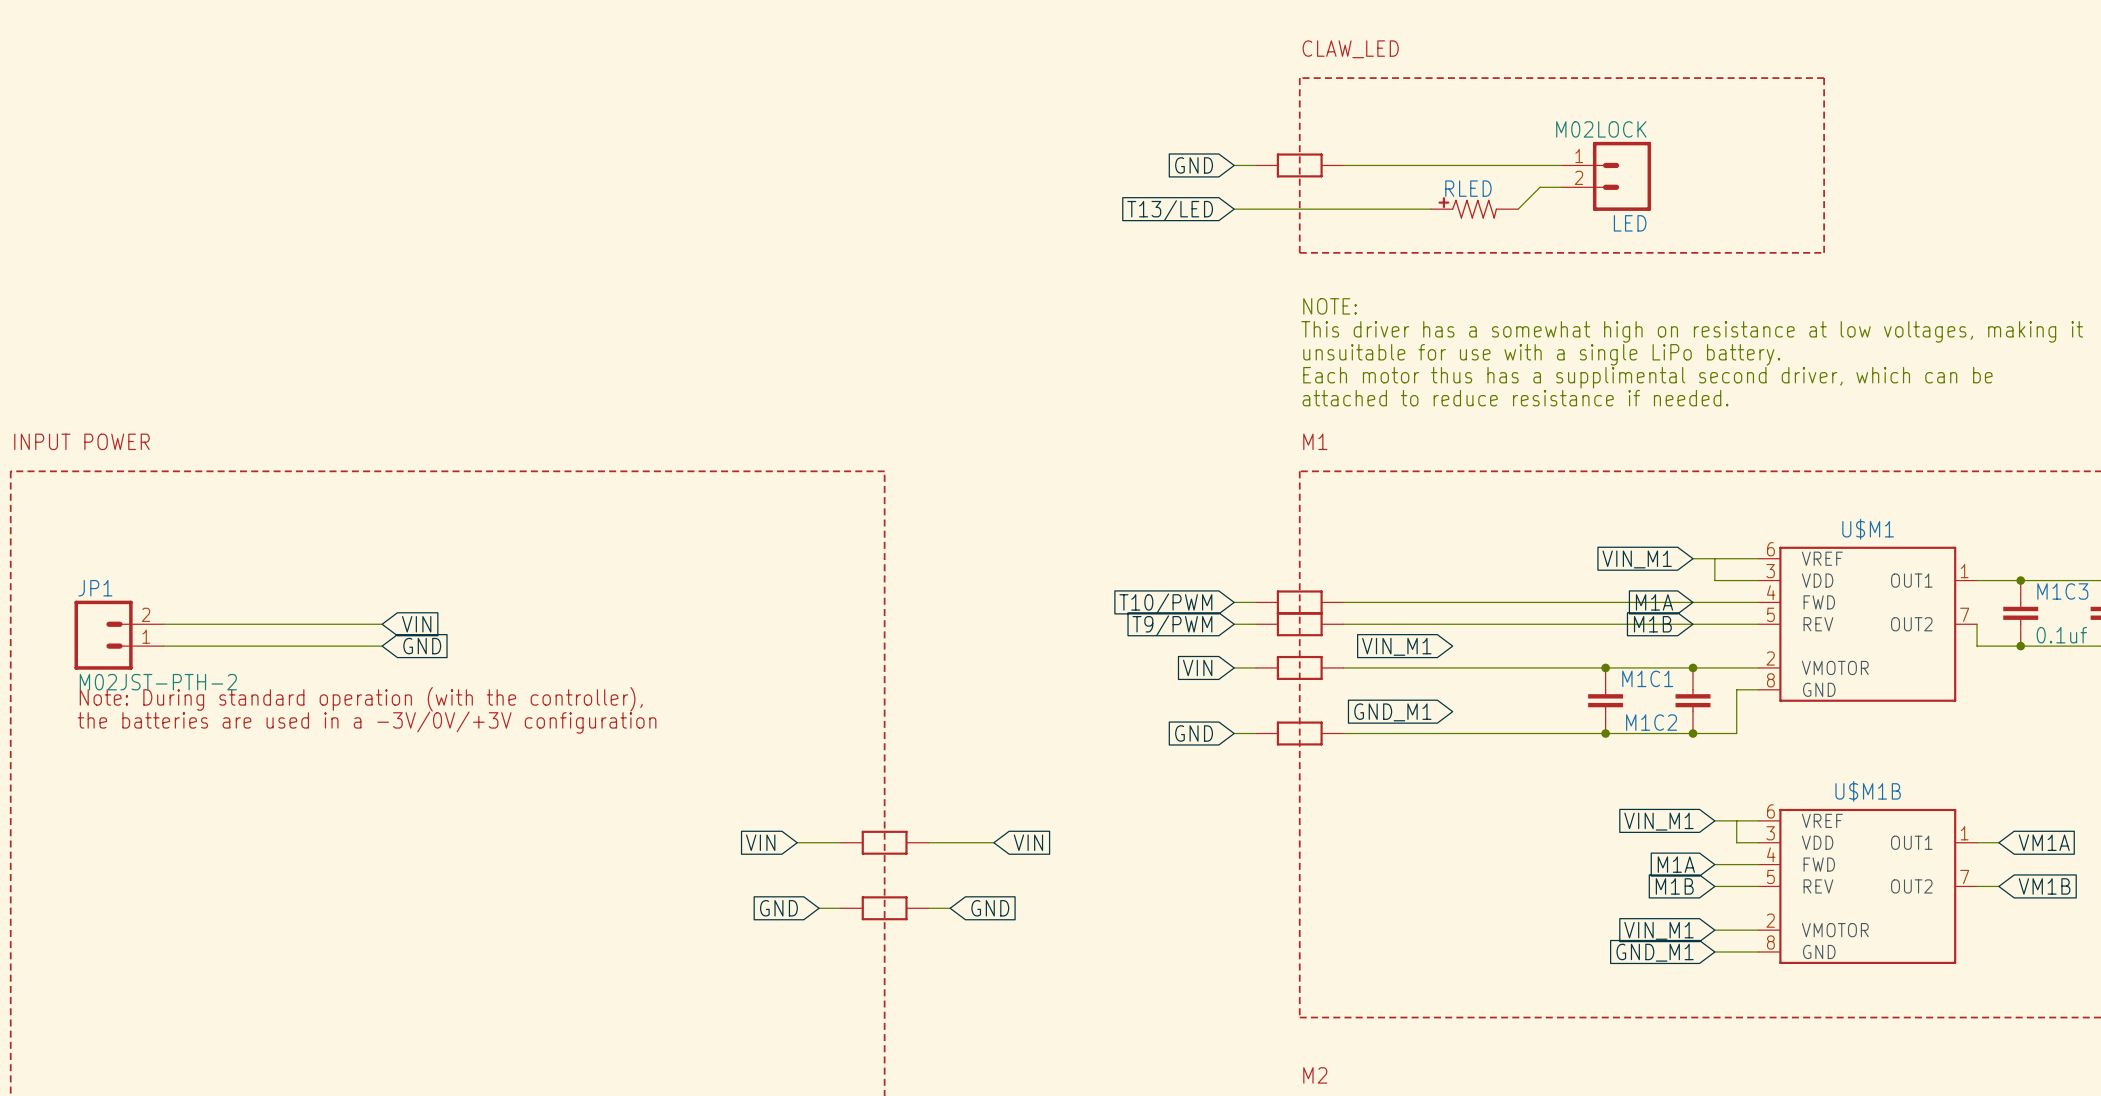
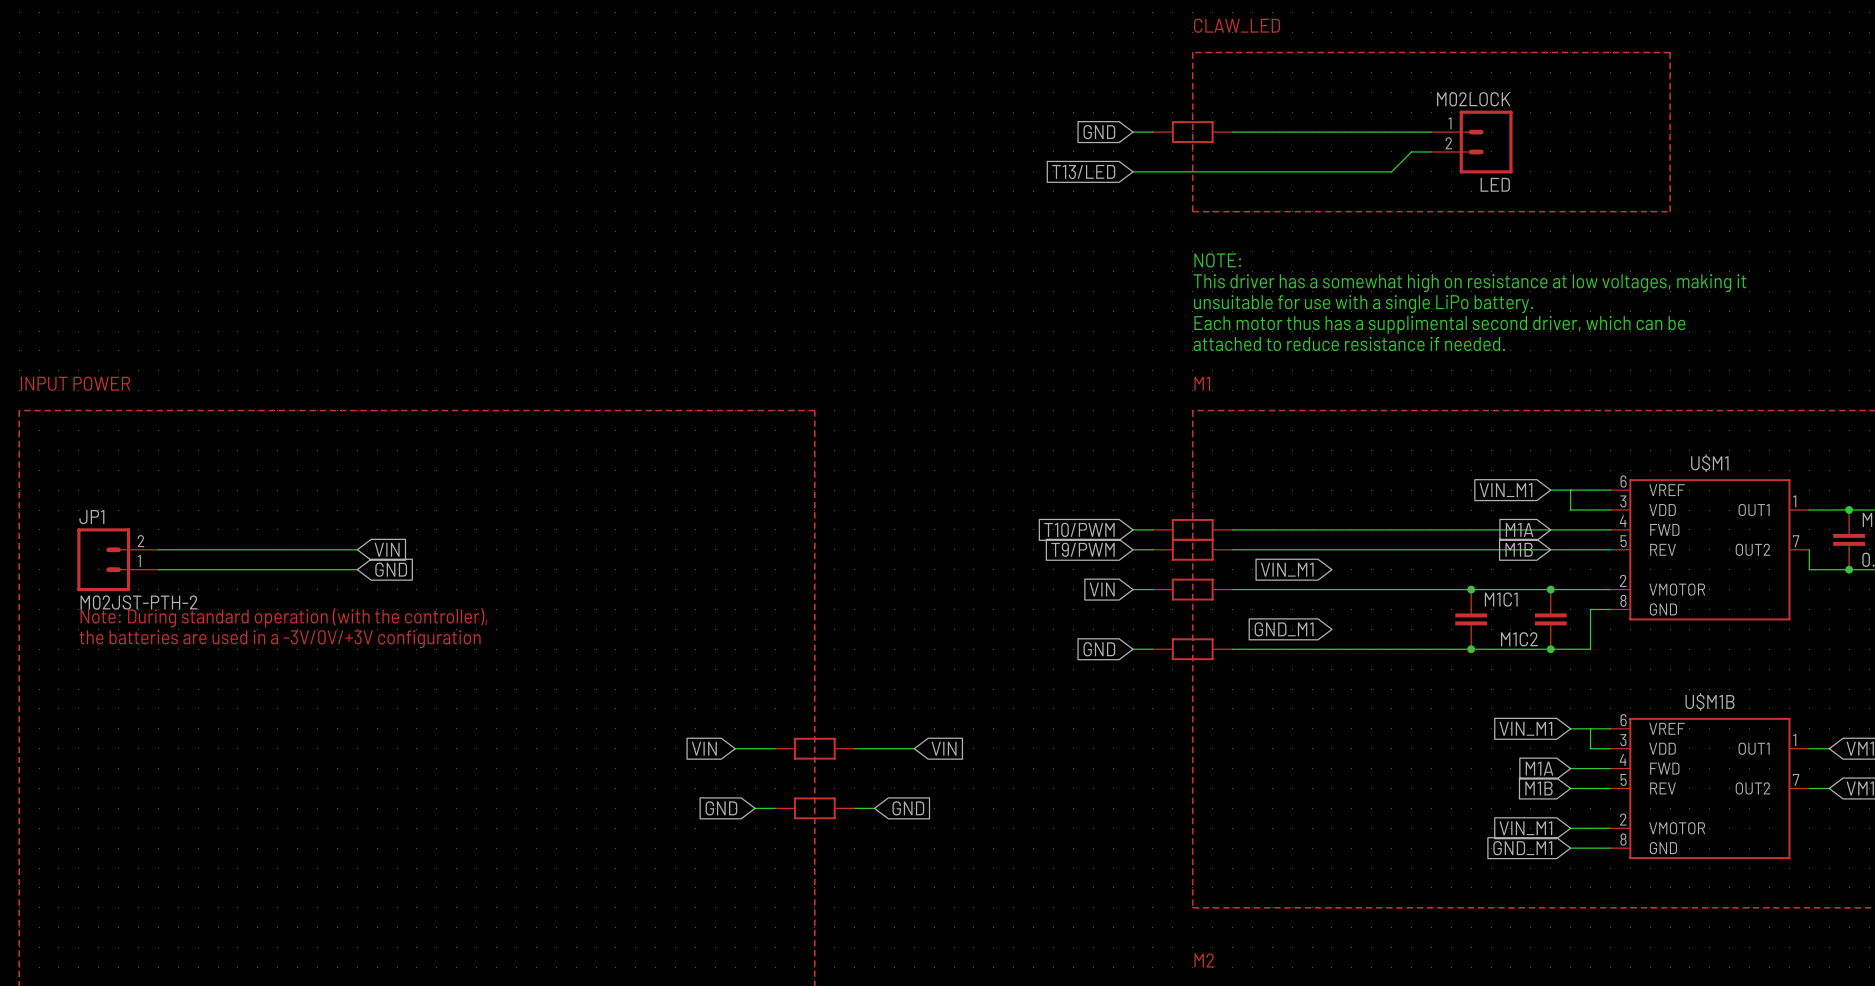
RLED: (1474, 207) -> none

